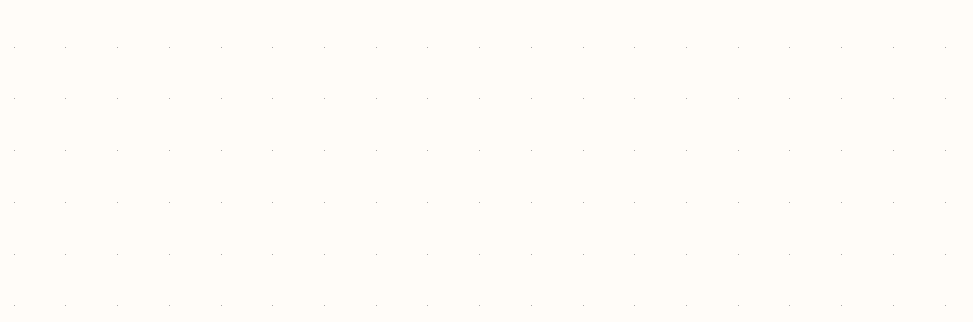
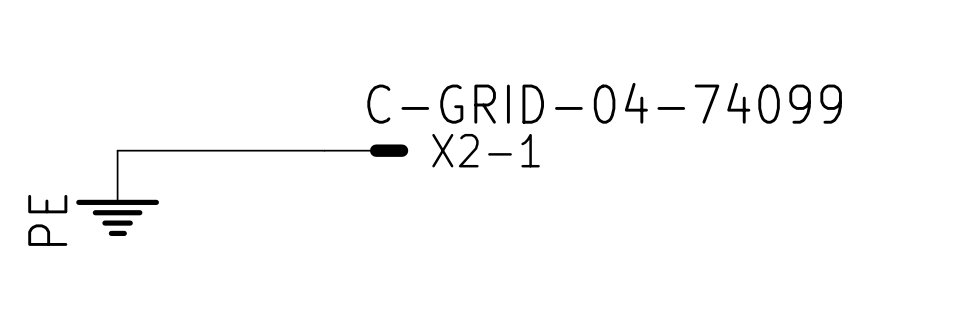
wire: none -> (117, 150) (324, 150)
X2-1: none -> C-GRID-04-74099 (366, 150)
power symbol: none -> PE (117, 193)

